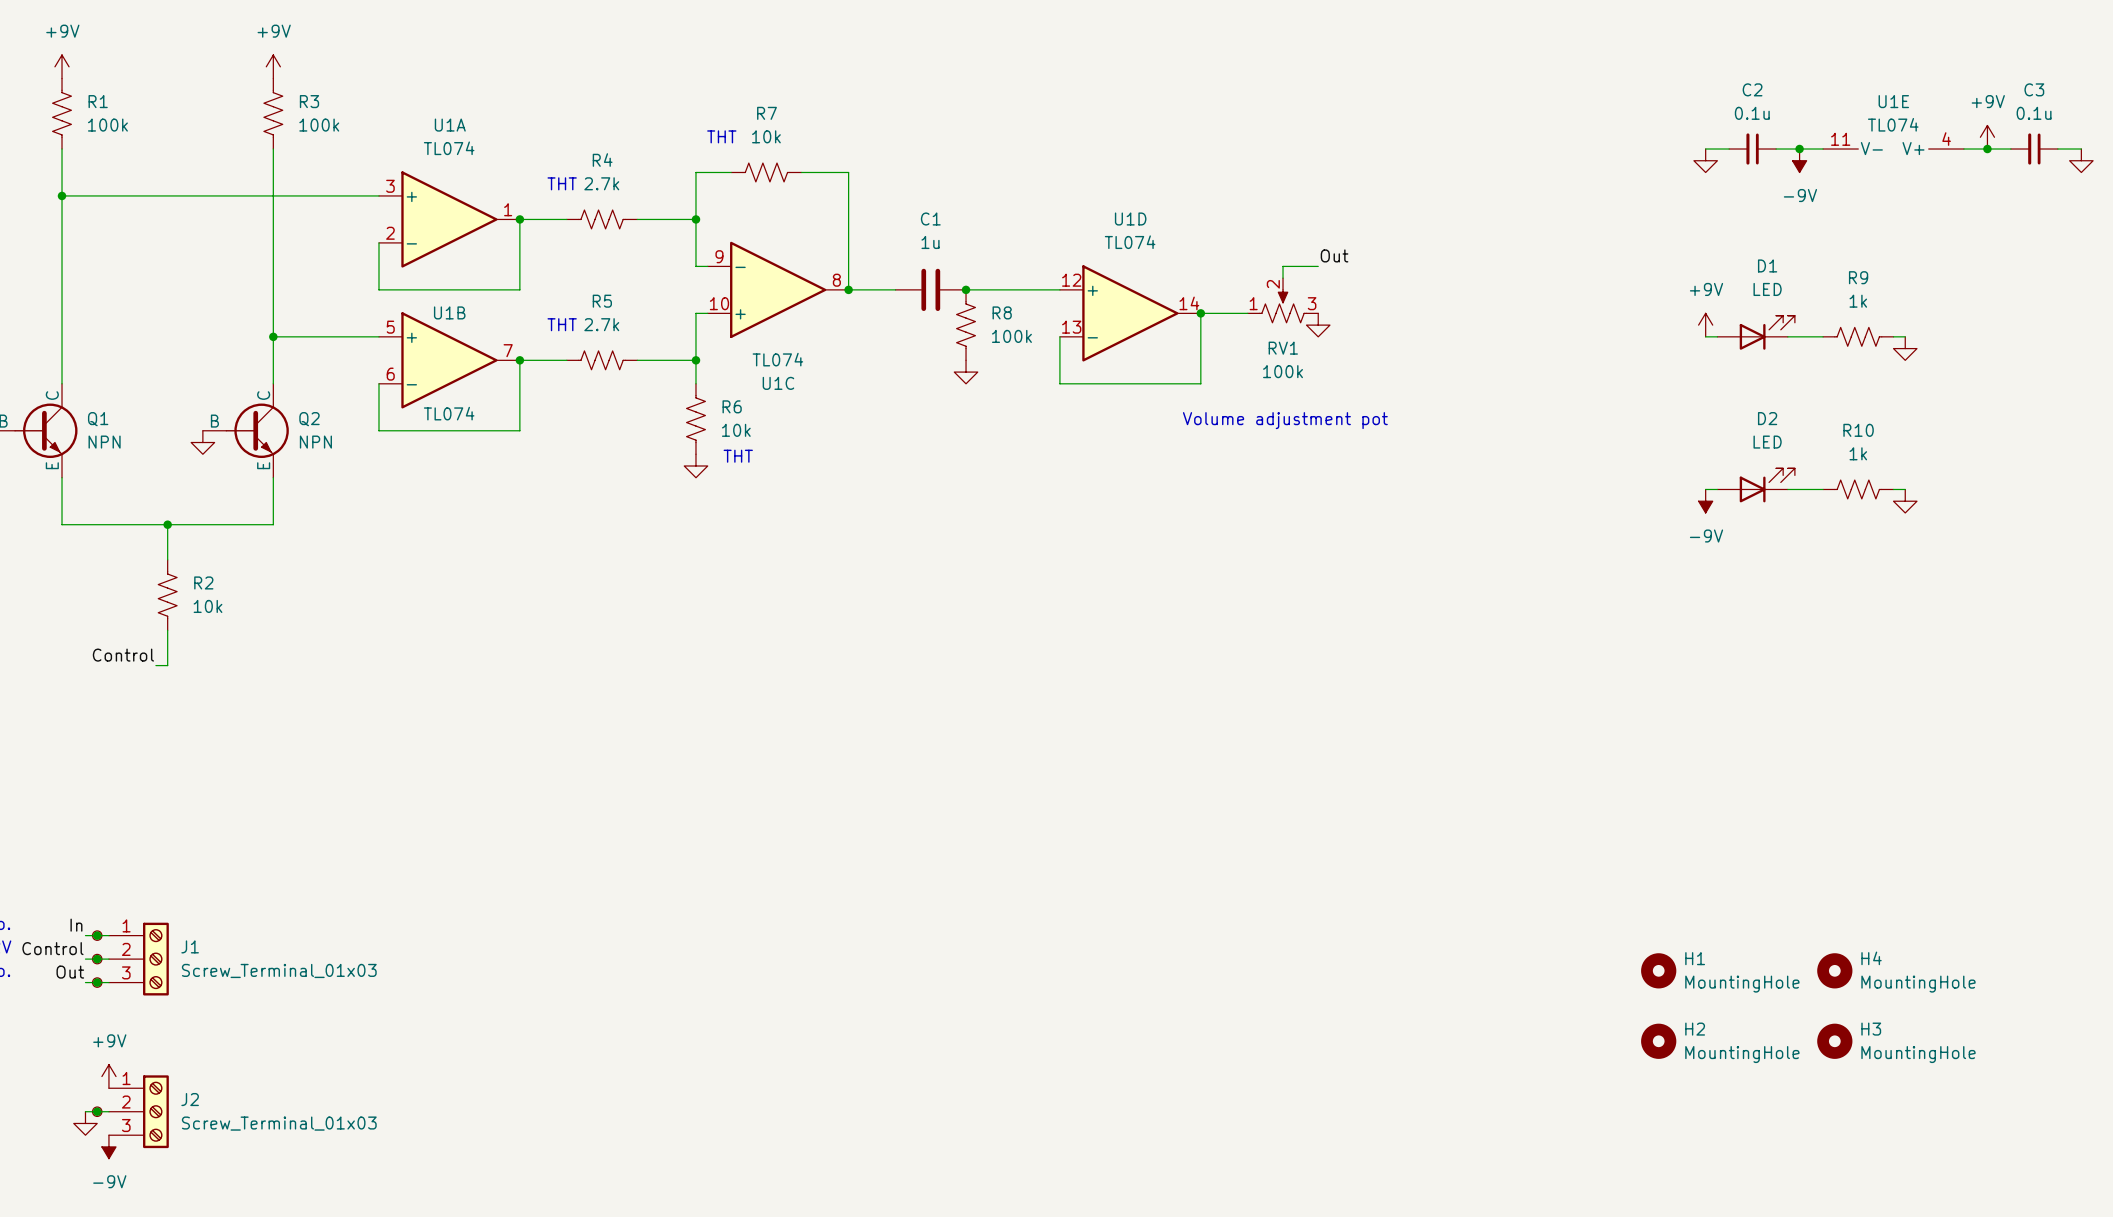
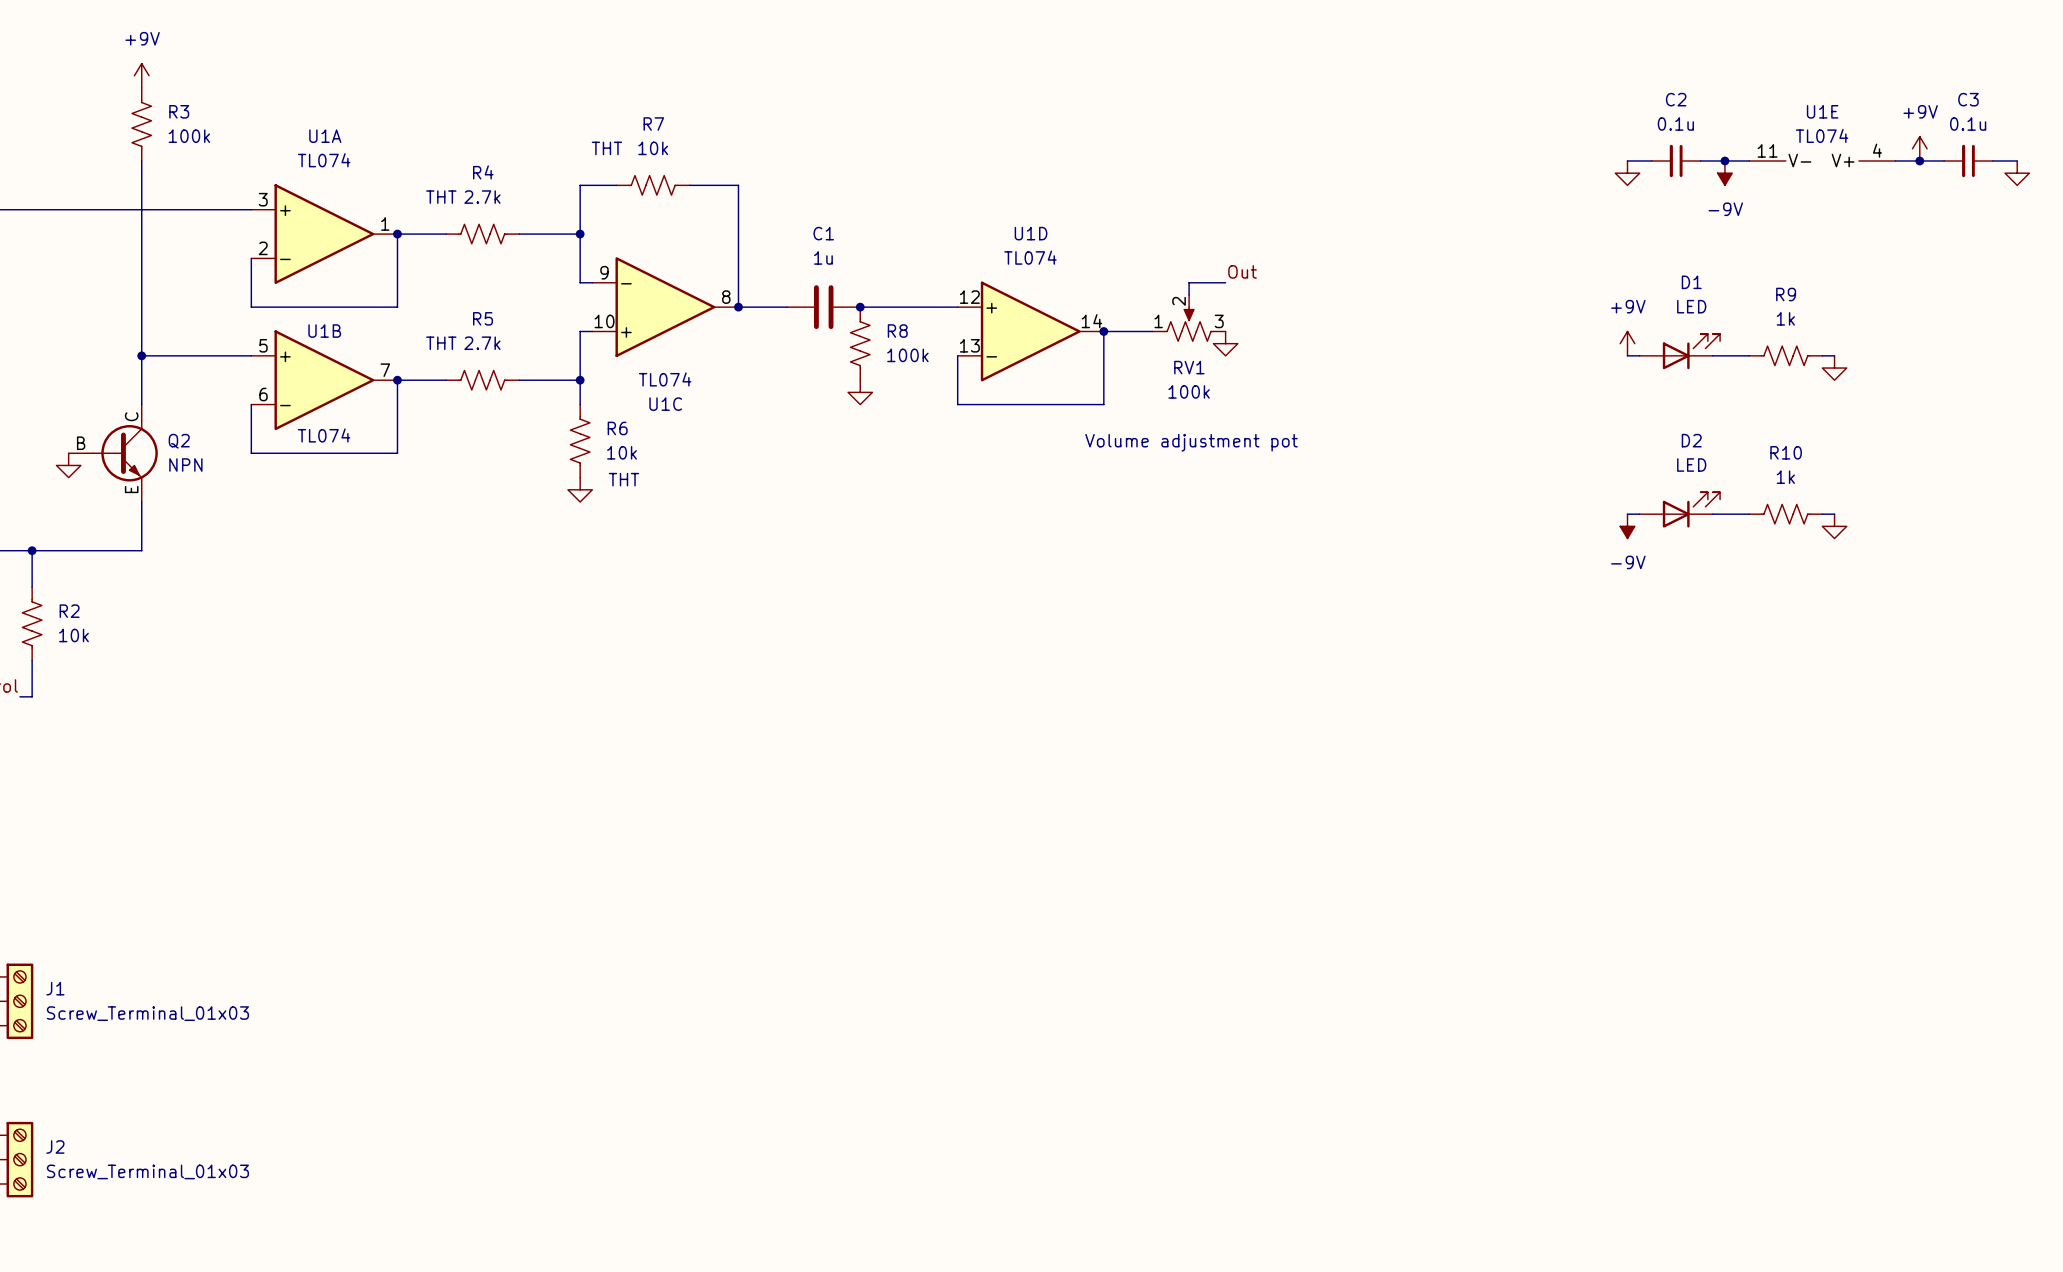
H1: MountingHole (1658, 970) -> none
H4: MountingHole (1834, 970) -> none
H2: MountingHole (1658, 1041) -> none
H3: MountingHole (1834, 1041) -> none

